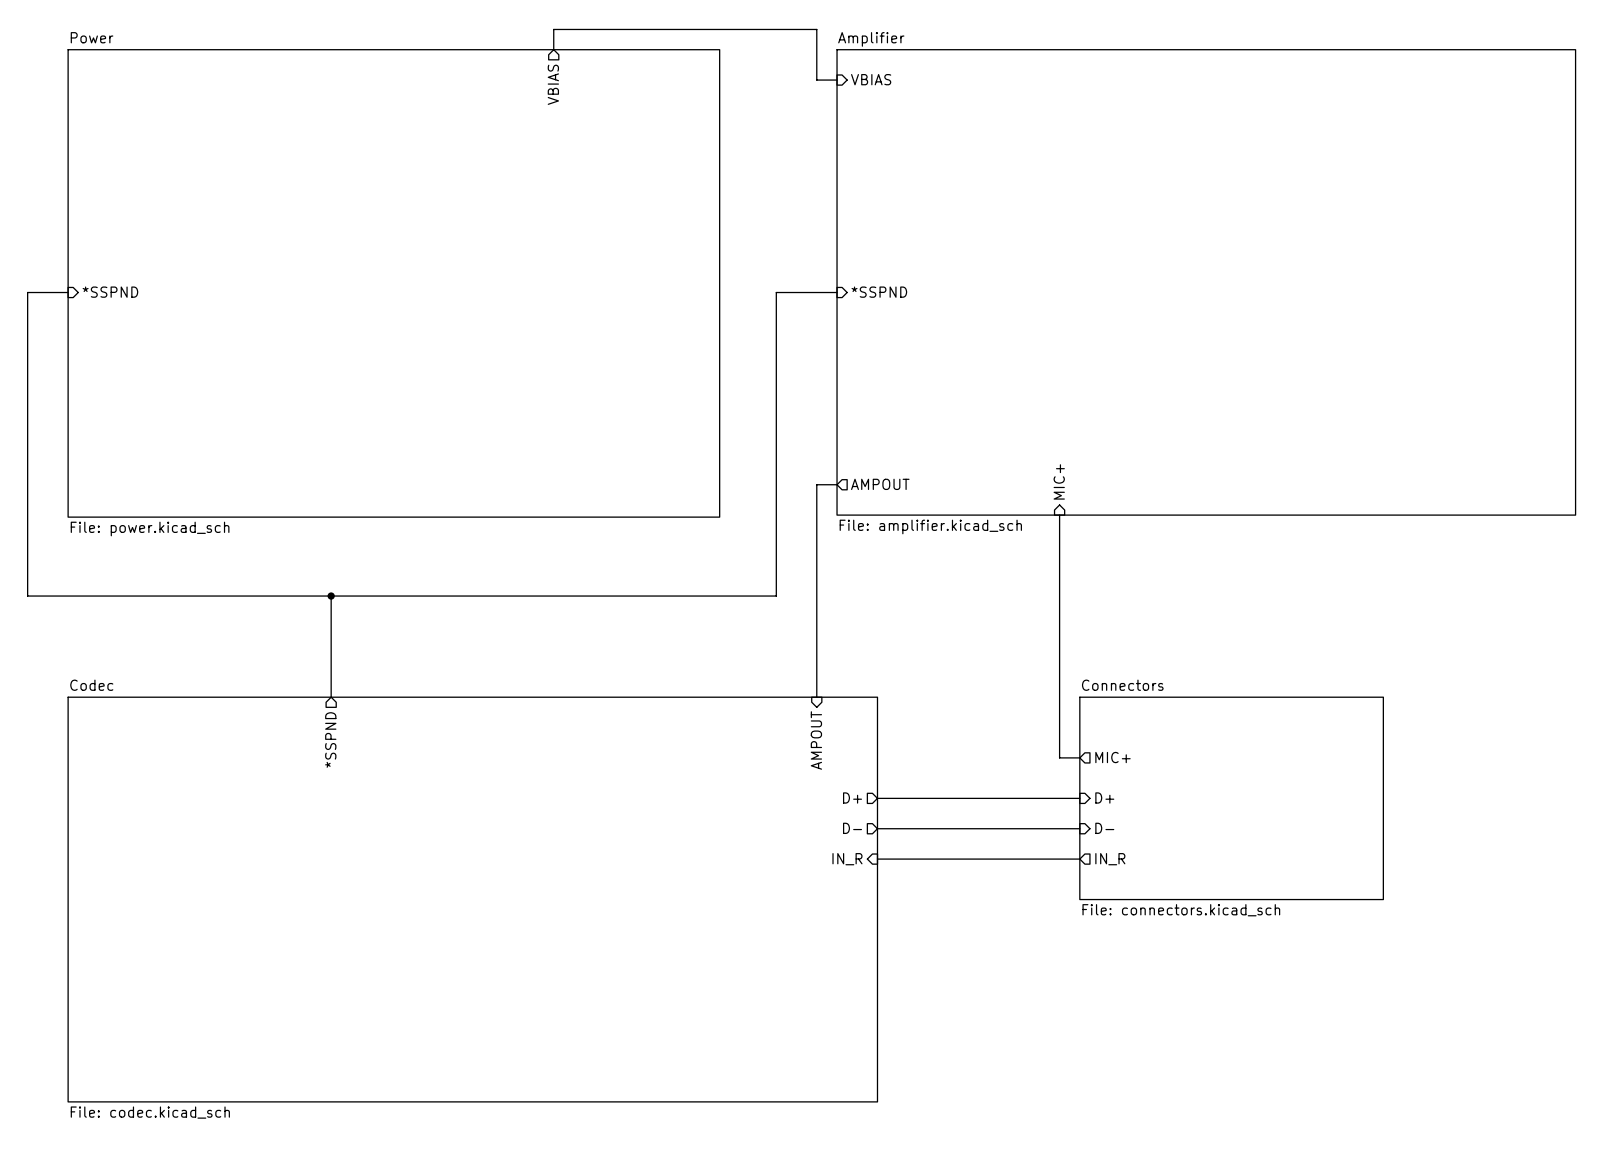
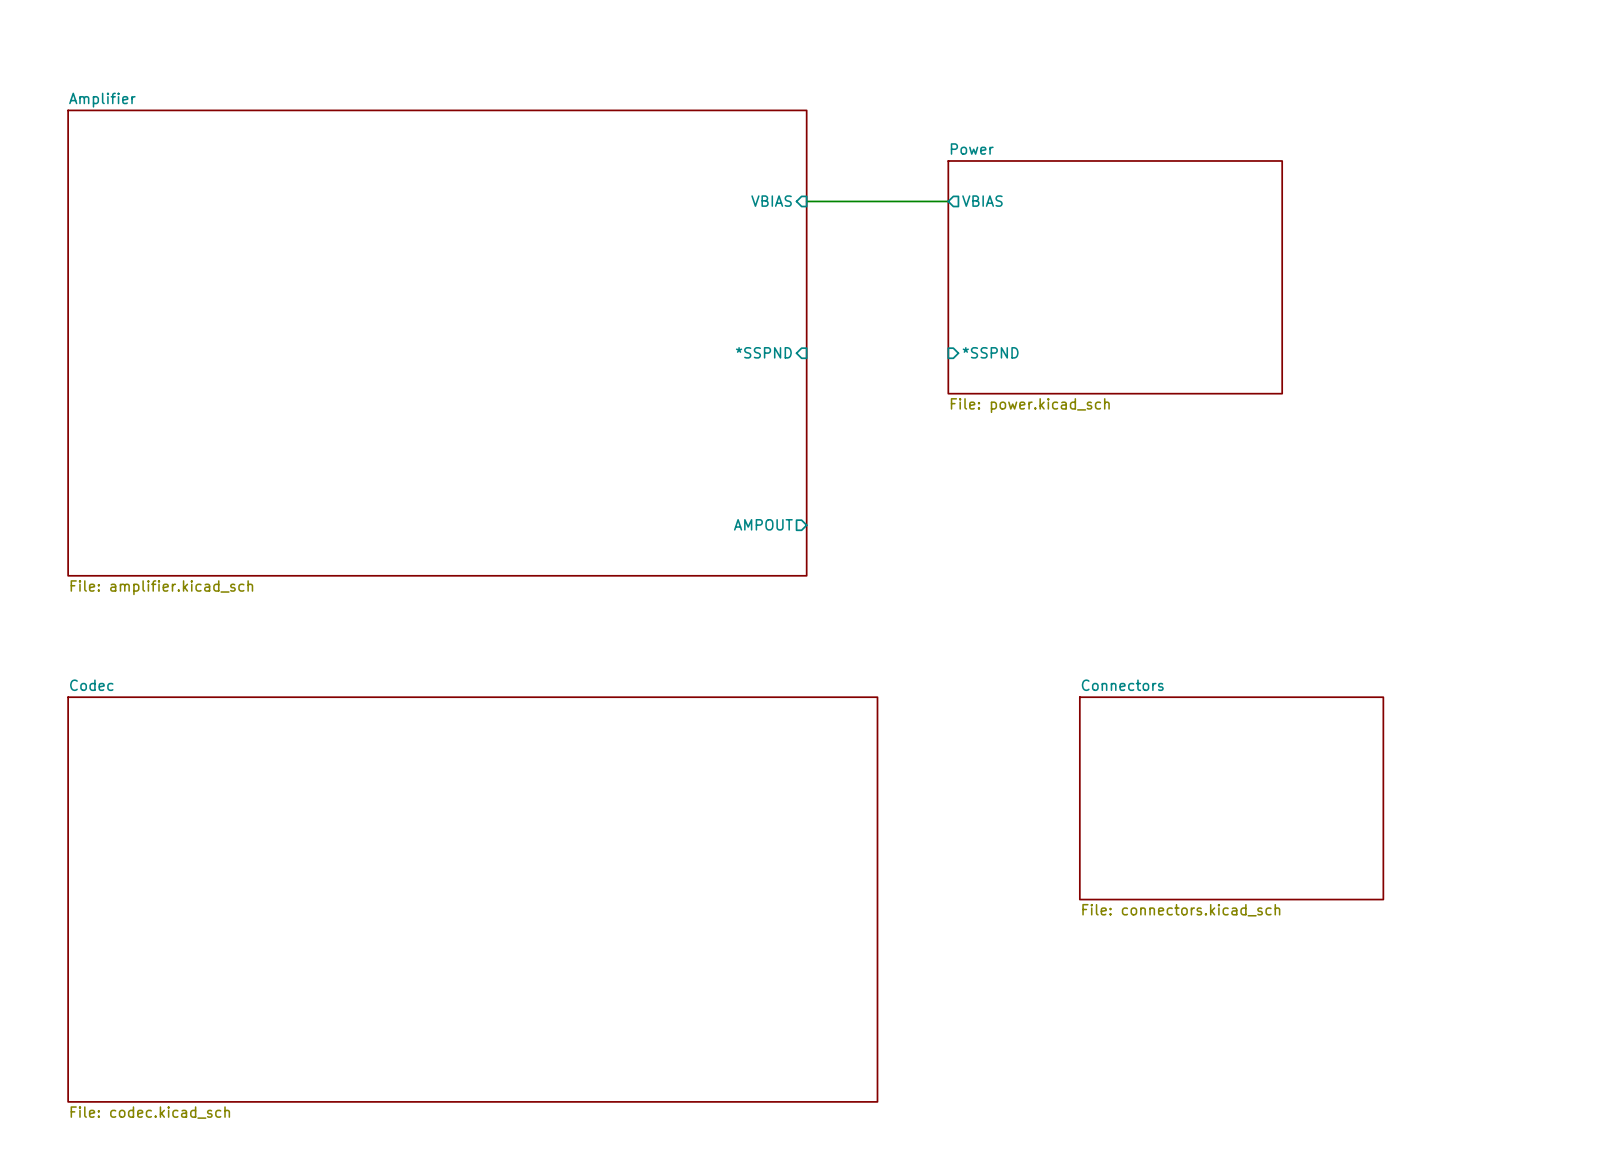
wire: (553, 49) (553, 29) (816, 29) (816, 80) (837, 80) -> none
sheet pin: VBIAS (871, 79) -> none
sheet pin: VBIAS (553, 84) -> none
sheet pin: none -> VBIAS (771, 201)
wire: none -> (806, 201) (948, 201)
sheet pin: none -> VBIAS (982, 201)
sheet Power: none -> File: power.kicad_sch (1115, 277)
sheet Amplifier: File: amplifier.kicad_sch (1206, 282) -> none
sheet Power: File: power.kicad_sch (393, 283) -> none
wire: (68, 292) (27, 292) (27, 596) (776, 596) (776, 292) (837, 292) -> none
sheet pin: *SSPND (110, 292) -> none
sheet pin: *SSPND (879, 292) -> none
sheet Amplifier: none -> File: amplifier.kicad_sch (437, 343)
sheet pin: none -> *SSPND (763, 352)
sheet pin: none -> *SSPND (990, 352)
sheet pin: MIC+ (1059, 481) -> none
wire: (837, 484) (816, 484) (816, 697) -> none
sheet pin rotation: 0° (880, 484) -> 180° (763, 524)
sheet pin position: AMPOUT (880, 484) -> AMPOUT (763, 524)
wire: (1059, 515) (1059, 757) (1079, 757) -> none
wire: (331, 596) (331, 697) -> none
junction: (331, 596) -> none
sheet pin: *SSPND (330, 740) -> none
sheet pin: AMPOUT (816, 740) -> none
sheet pin: MIC+ (1112, 757) -> none
sheet pin: D+ (852, 798) -> none
wire: (877, 798) (1079, 798) -> none
sheet pin: D+ (1104, 798) -> none
sheet pin: D- (852, 828) -> none
wire: (877, 828) (1079, 828) -> none
sheet pin: D- (1104, 828) -> none
sheet pin: IN_R (847, 859) -> none
wire: (877, 859) (1079, 859) -> none
sheet pin: IN_R (1110, 859) -> none

